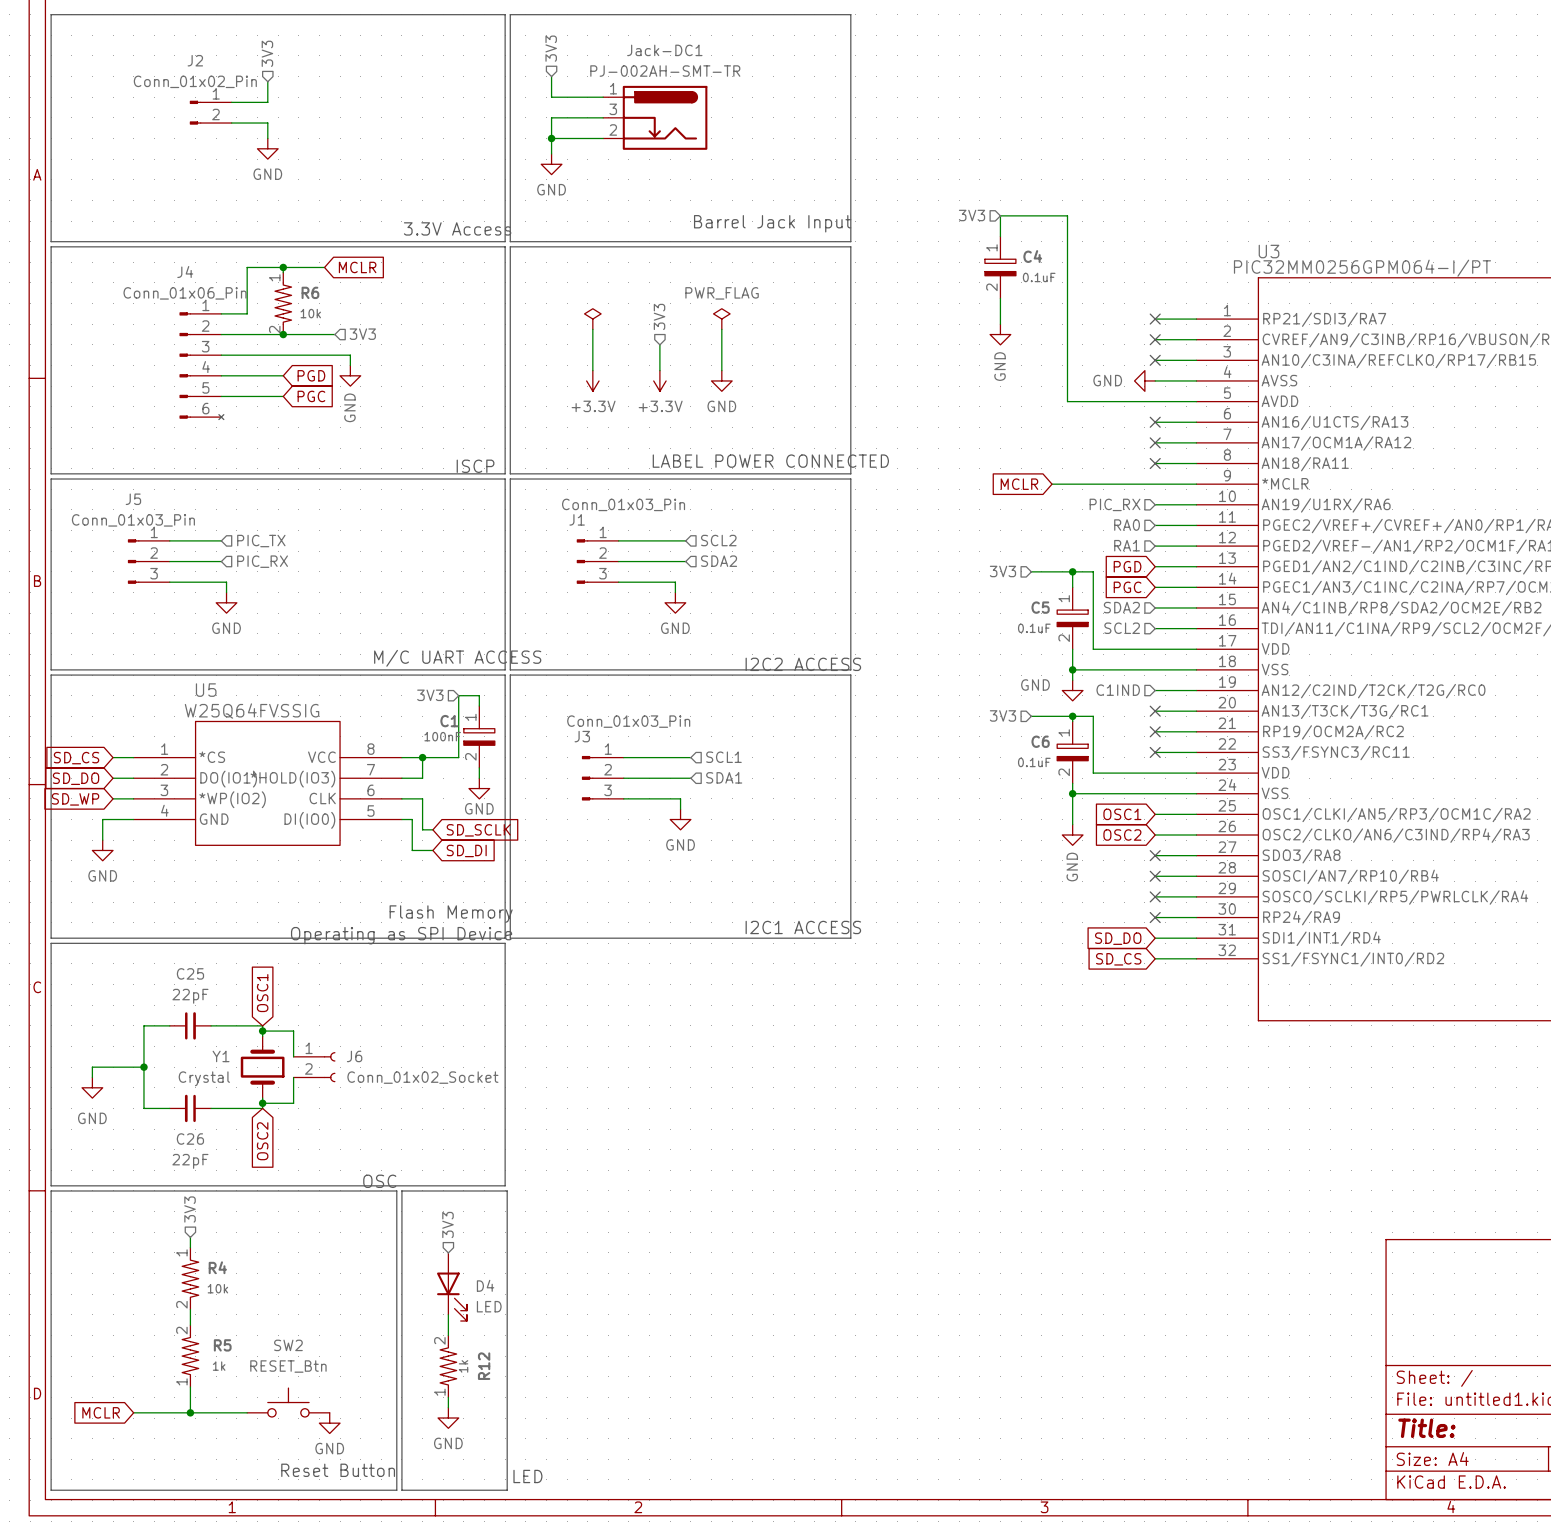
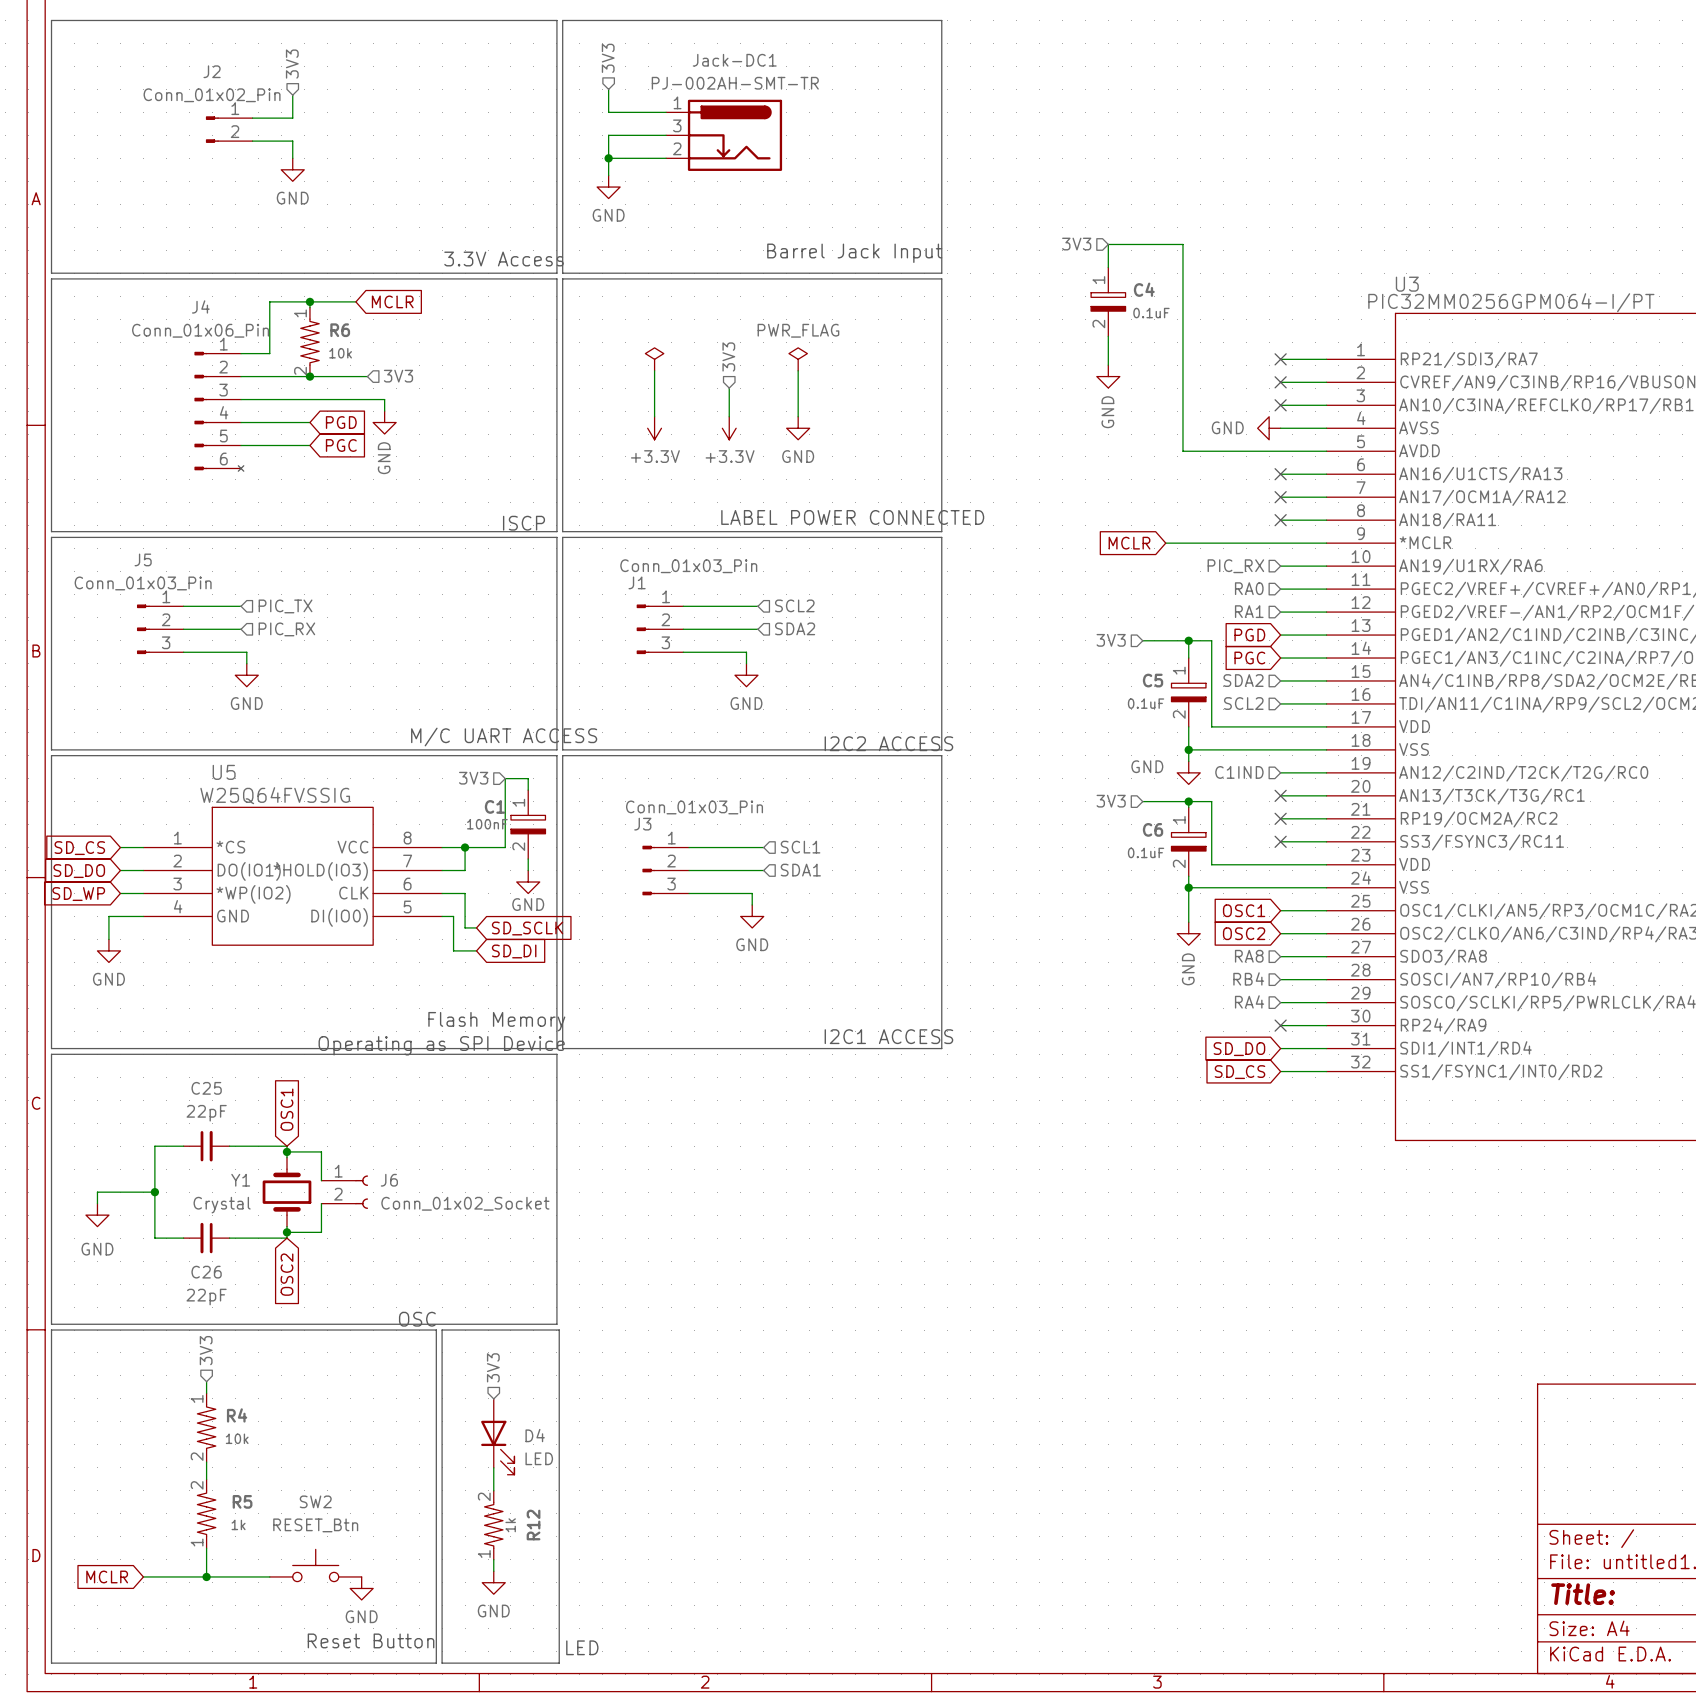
hierarchical label: none -> RA8 (1249, 956)
no-connect mark: (1155, 855) -> none
hierarchical label: none -> RB4 (1248, 978)
no-connect mark: (1155, 876) -> none
hierarchical label: none -> RA4 (1249, 1001)
no-connect mark: (1155, 896) -> none

